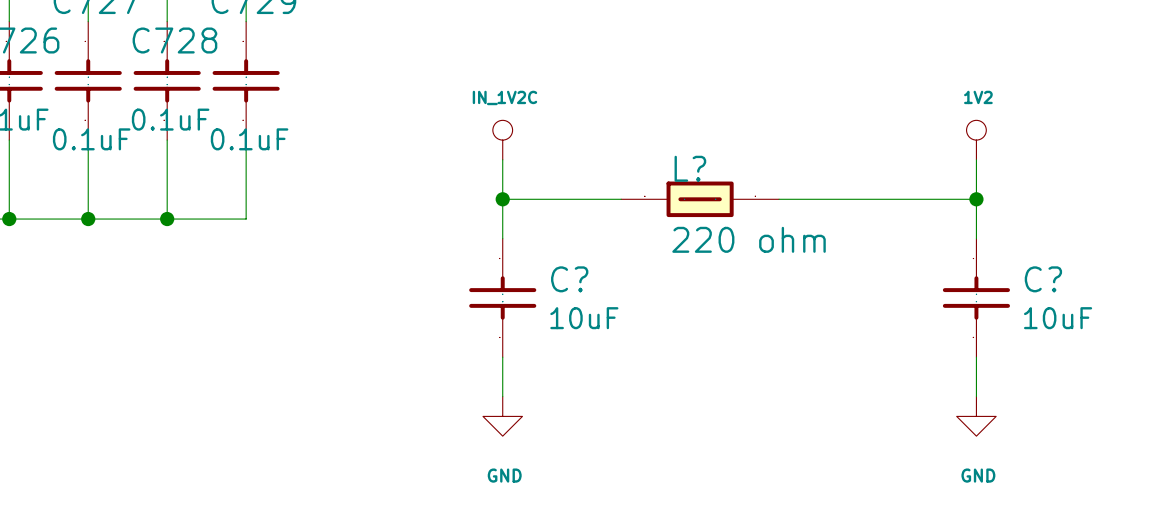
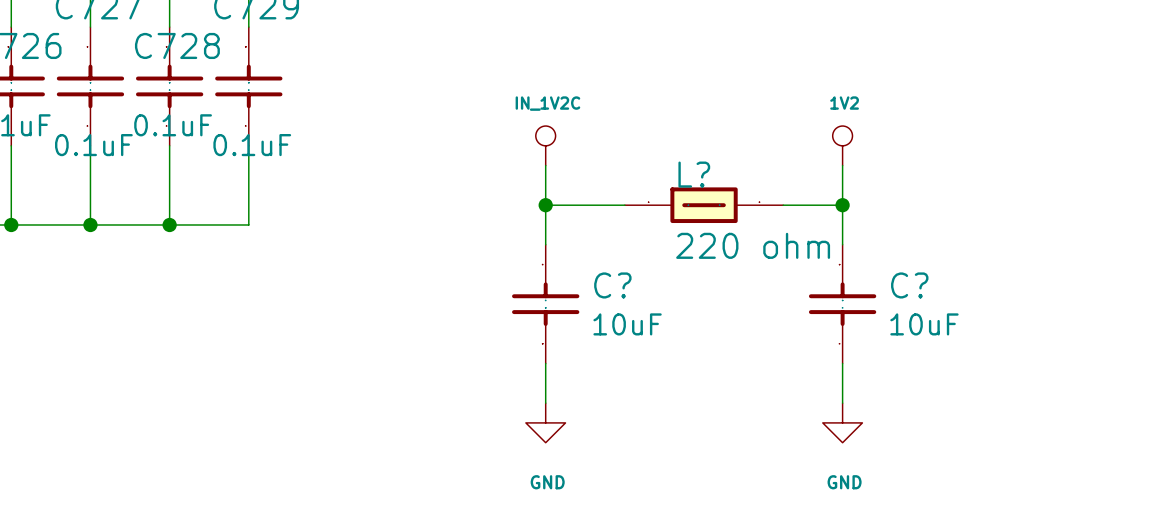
power symbol position: IN_1V2C (502, 140) -> IN_1V2C (545, 145)
power symbol position: 1V2 (976, 140) -> 1V2 (842, 145)
wire: (502, 159) (502, 238) -> (545, 165) (545, 244)
wire: (976, 159) (976, 238) -> (842, 165) (842, 244)
wire: (502, 199) (542, 199) -> none
junction position: (502, 199) -> (545, 205)
wire: (838, 199) (976, 199) -> none
junction: none -> (842, 205)
junction: (976, 199) -> none
C? position: (502, 297) -> (545, 304)
C? position: (976, 297) -> (842, 304)
wire: (502, 357) (502, 396) -> (545, 363) (545, 403)
wire: (976, 357) (976, 396) -> (842, 363) (842, 403)
power symbol position: GND (502, 416) -> GND (545, 422)
power symbol position: GND (976, 416) -> GND (842, 422)

